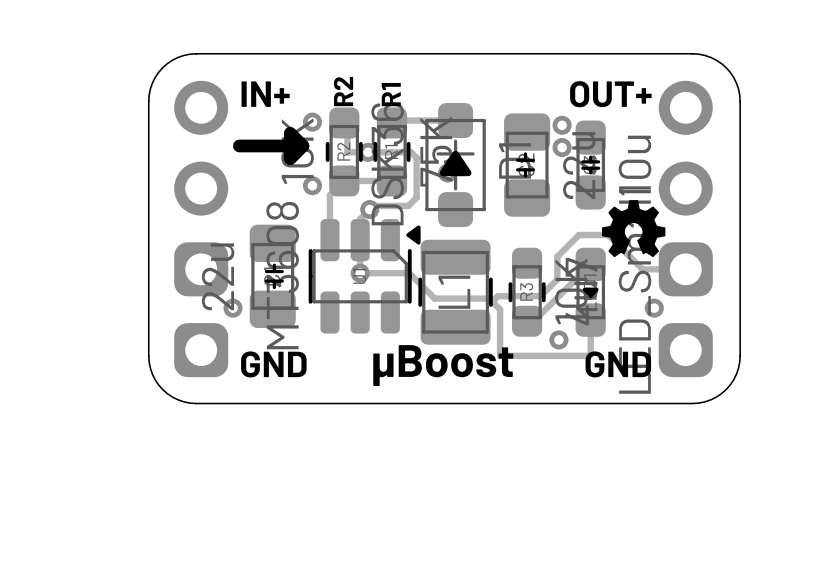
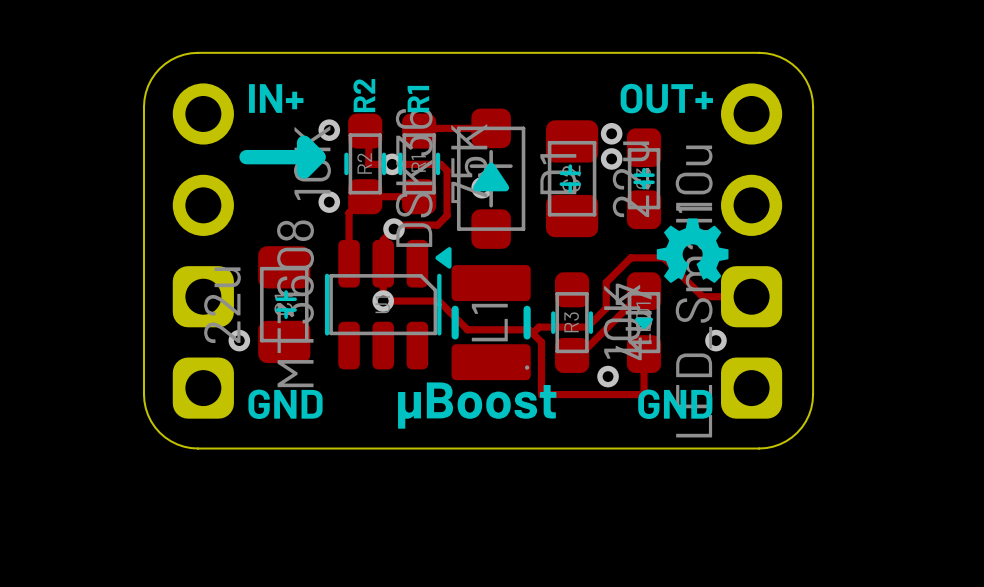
L1 footprint: [418, 239, 493, 345] -> [451, 265, 531, 381]

